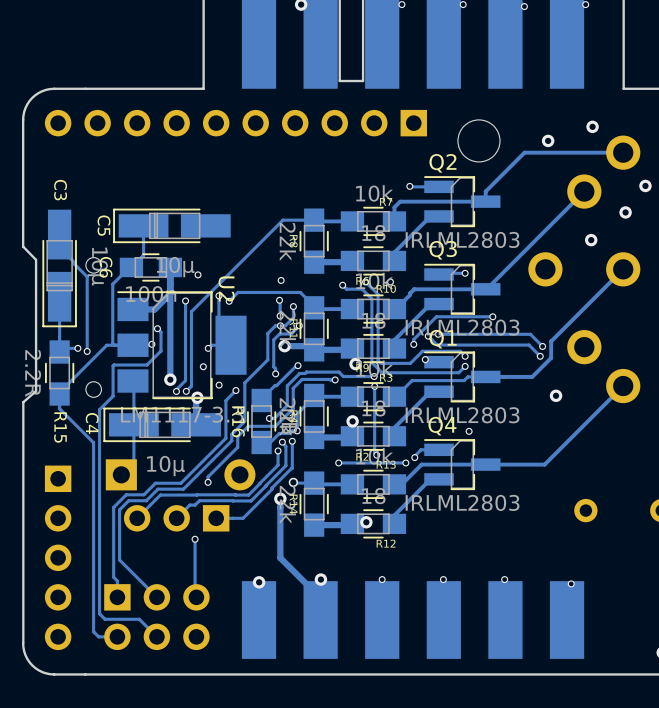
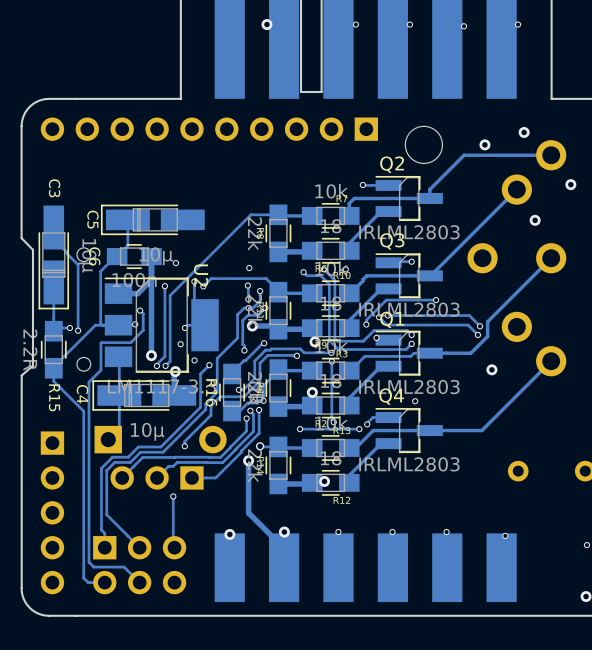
via: (625, 212) -> none
via: none -> (535, 220)
via: (591, 240) -> none

